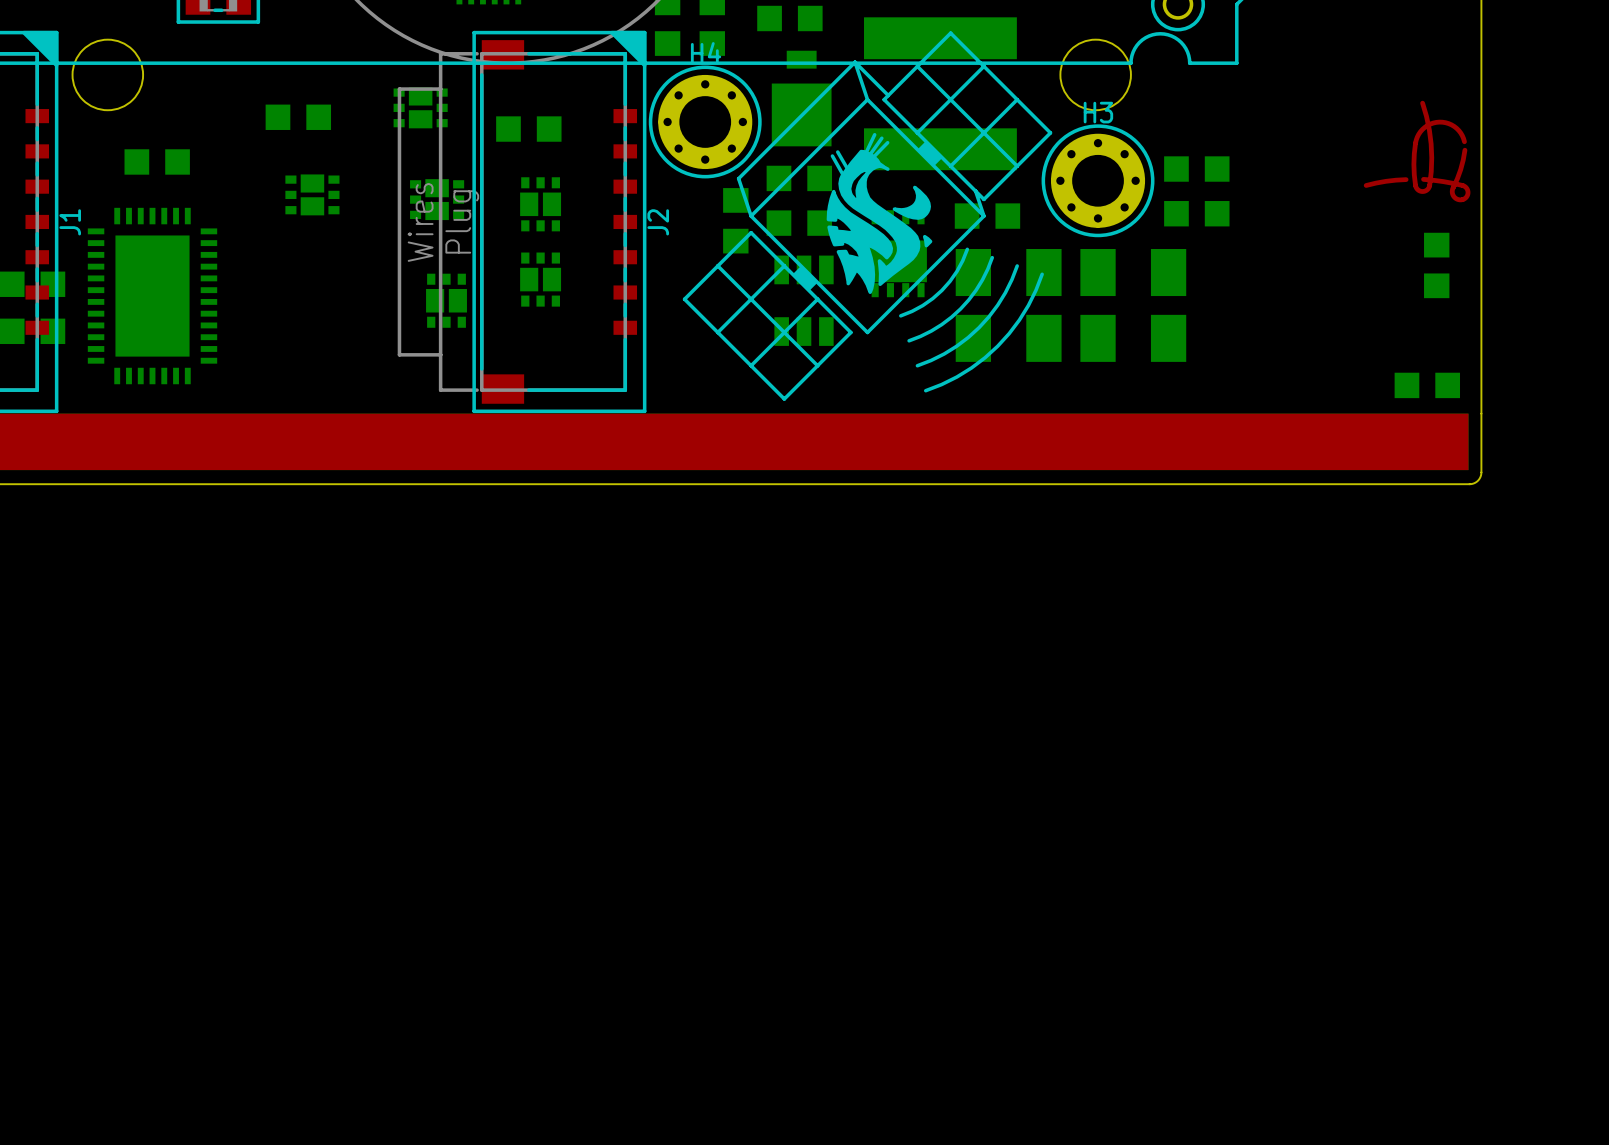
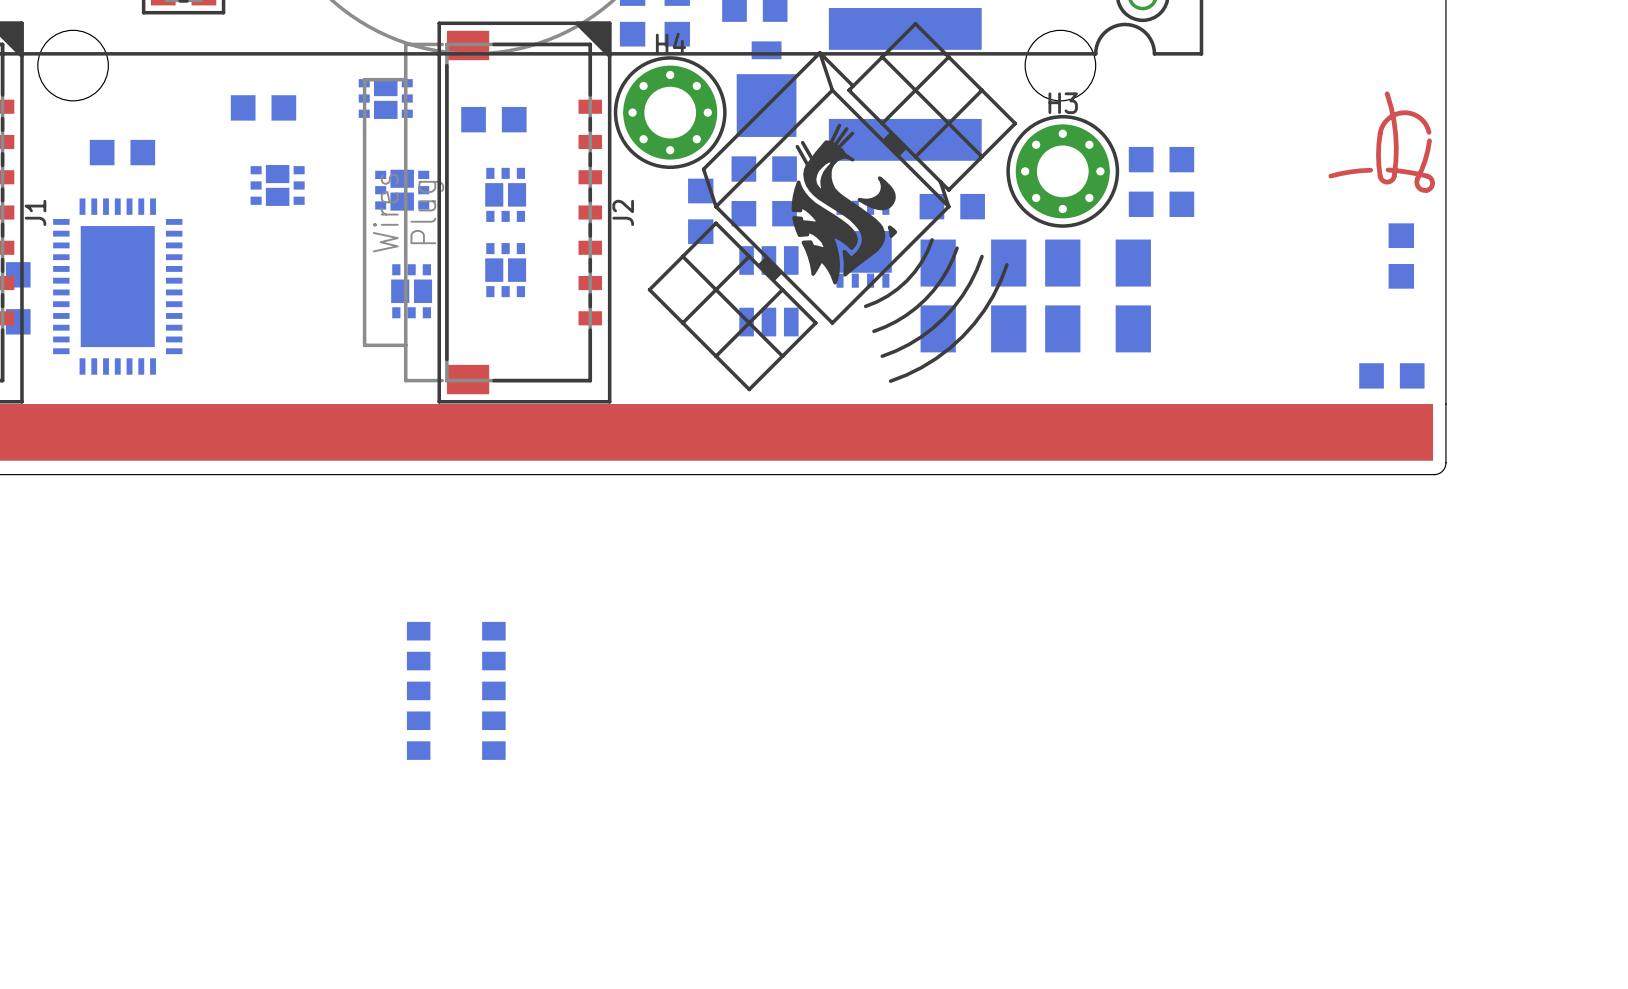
part: none -> (456, 690)

